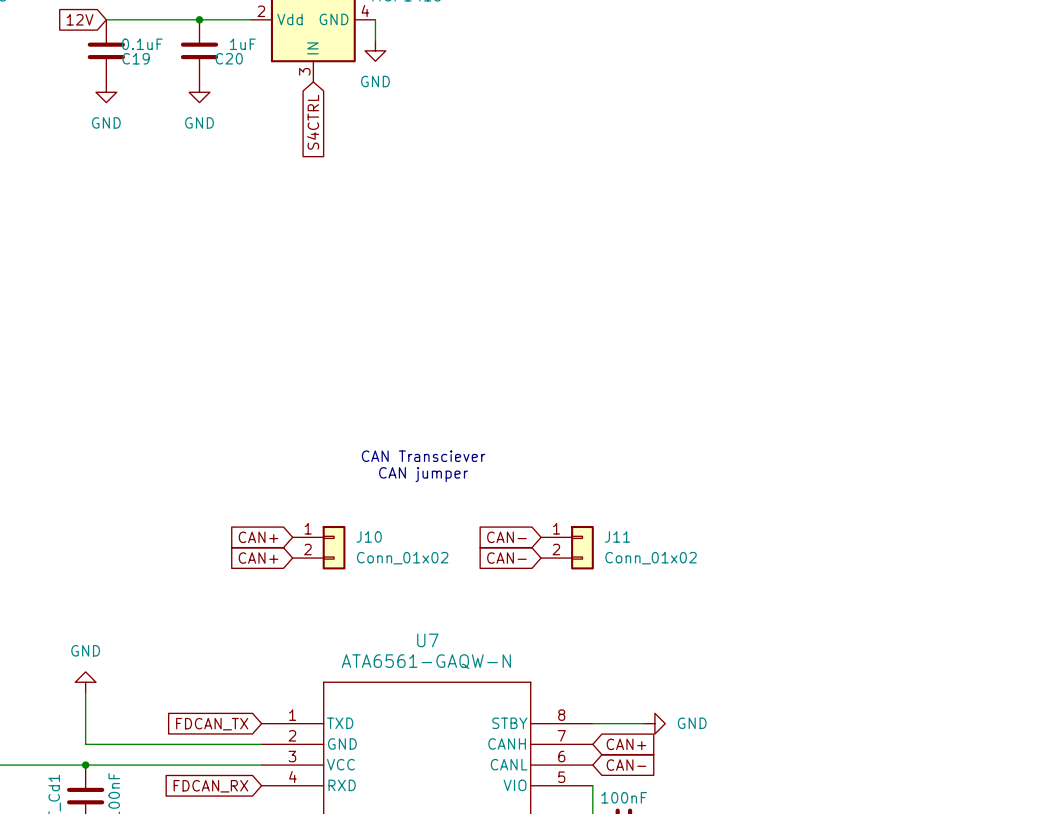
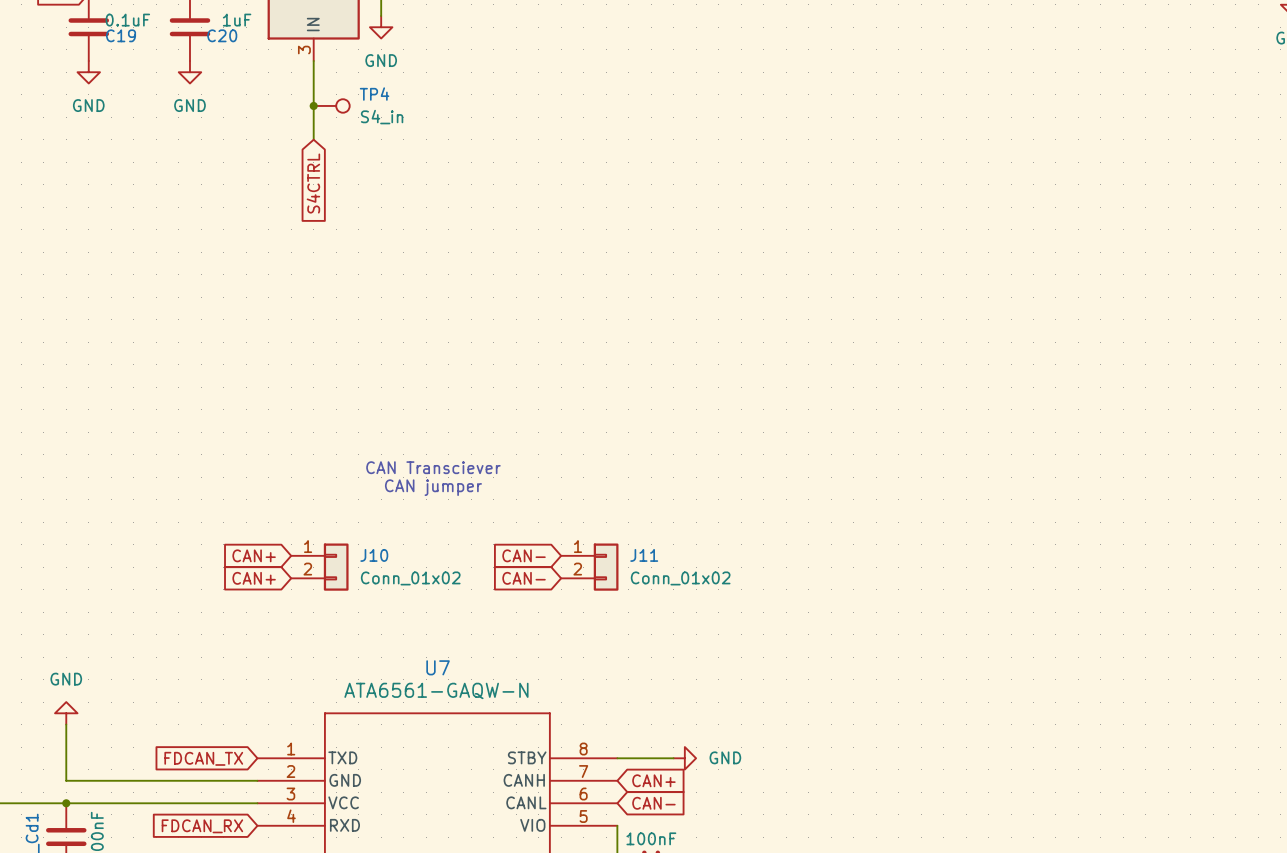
wire: none -> (313, 60) (313, 139)
global label position: S4CTRL (313, 122) -> S4CTRL (313, 183)
junction: none -> (313, 105)
TP4: none -> S4_in (331, 105)

